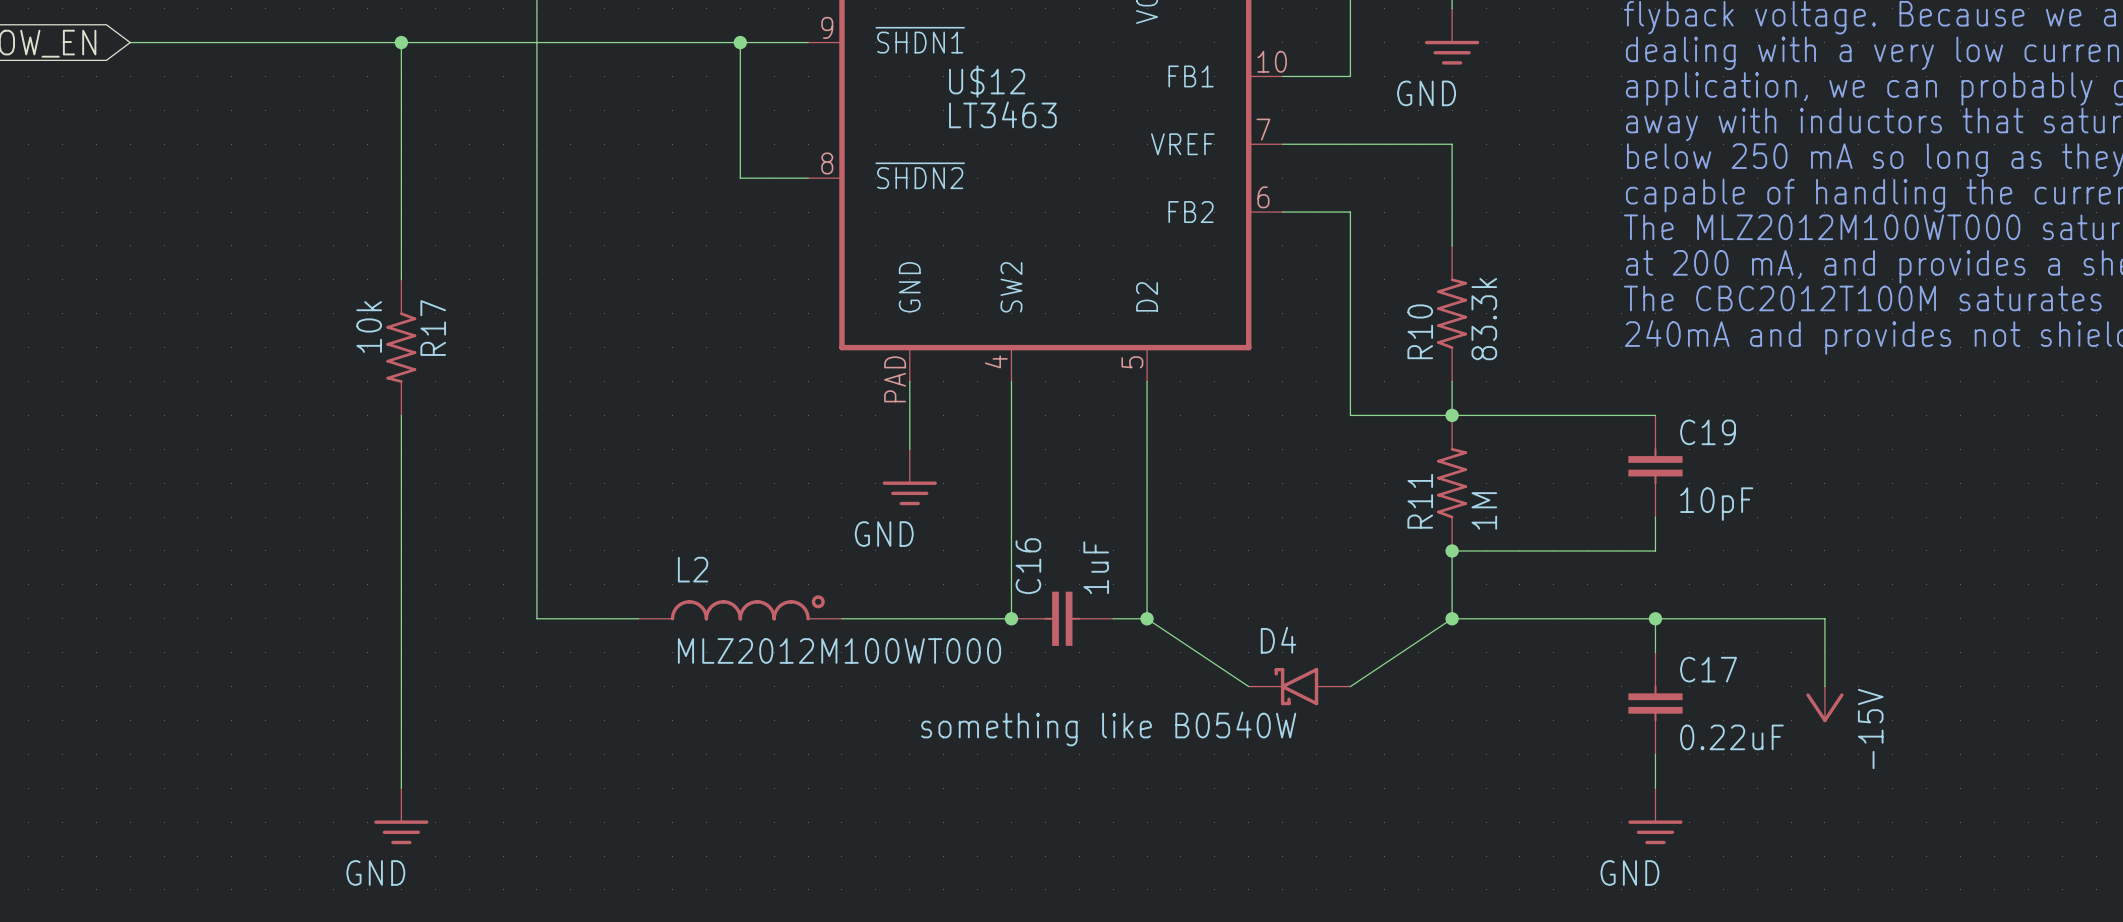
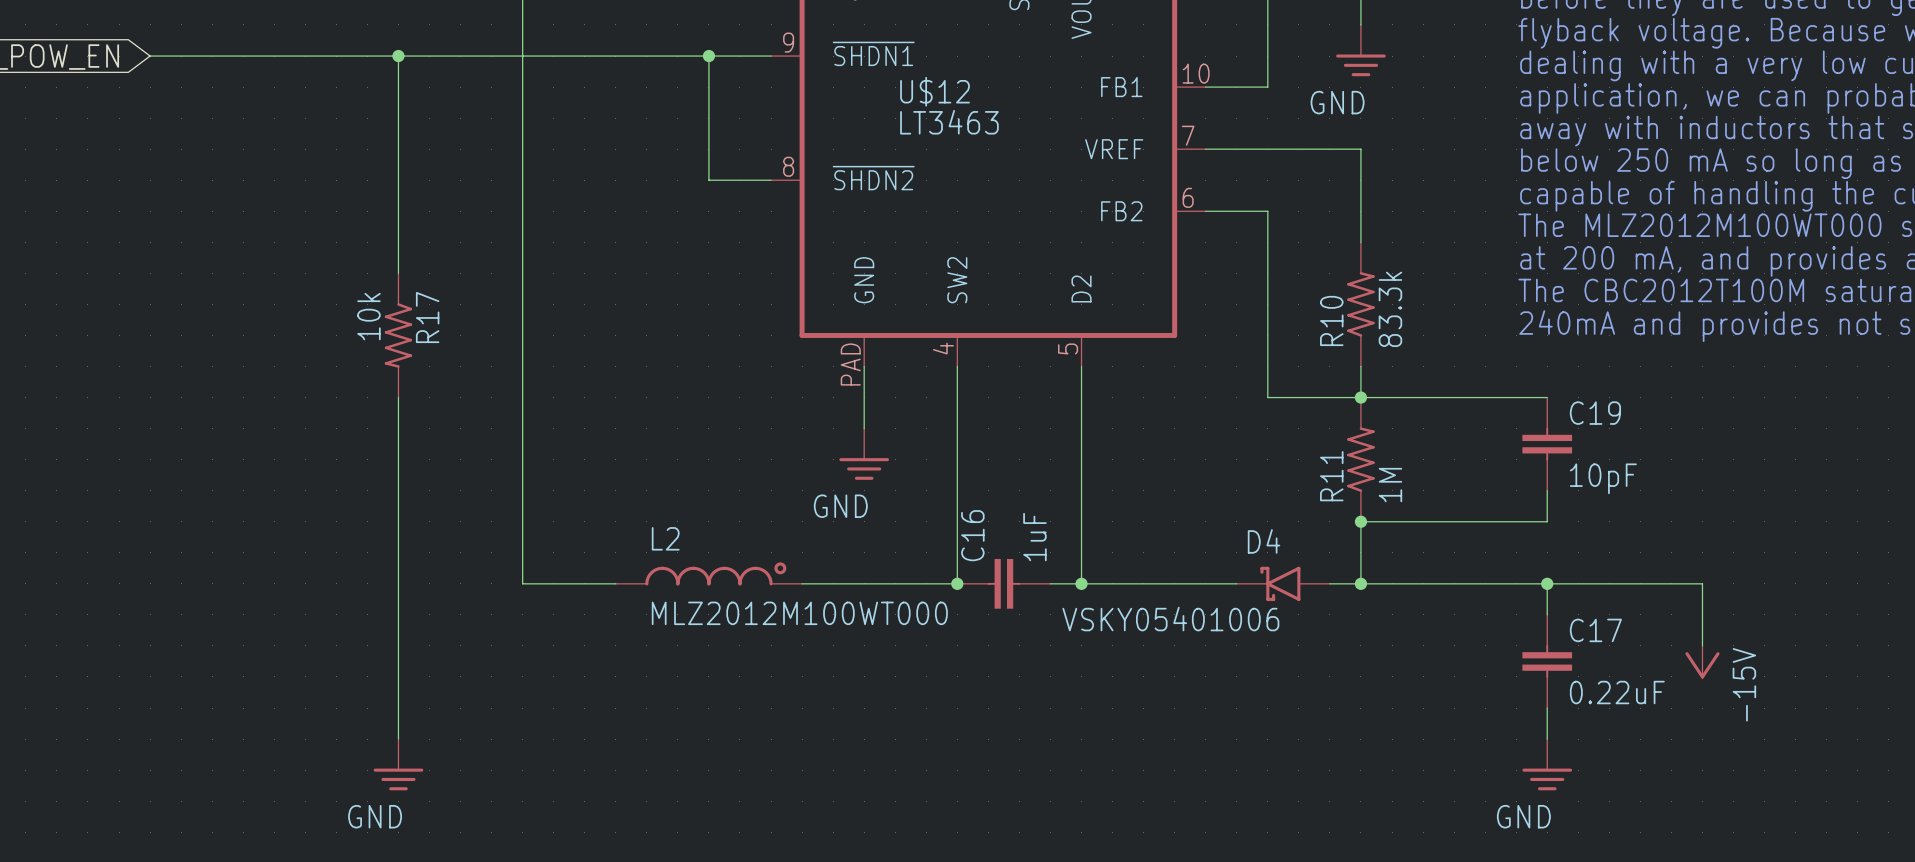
wire: (1147, 618) (1248, 686) -> (1081, 583) (1236, 583)
wire: (1452, 618) (1350, 686) -> (1360, 583) (1329, 583)
D4 position: (1299, 686) -> (1283, 583)
D4 value: something like B0540W (1108, 728) -> VSKY05401006 (1170, 619)

